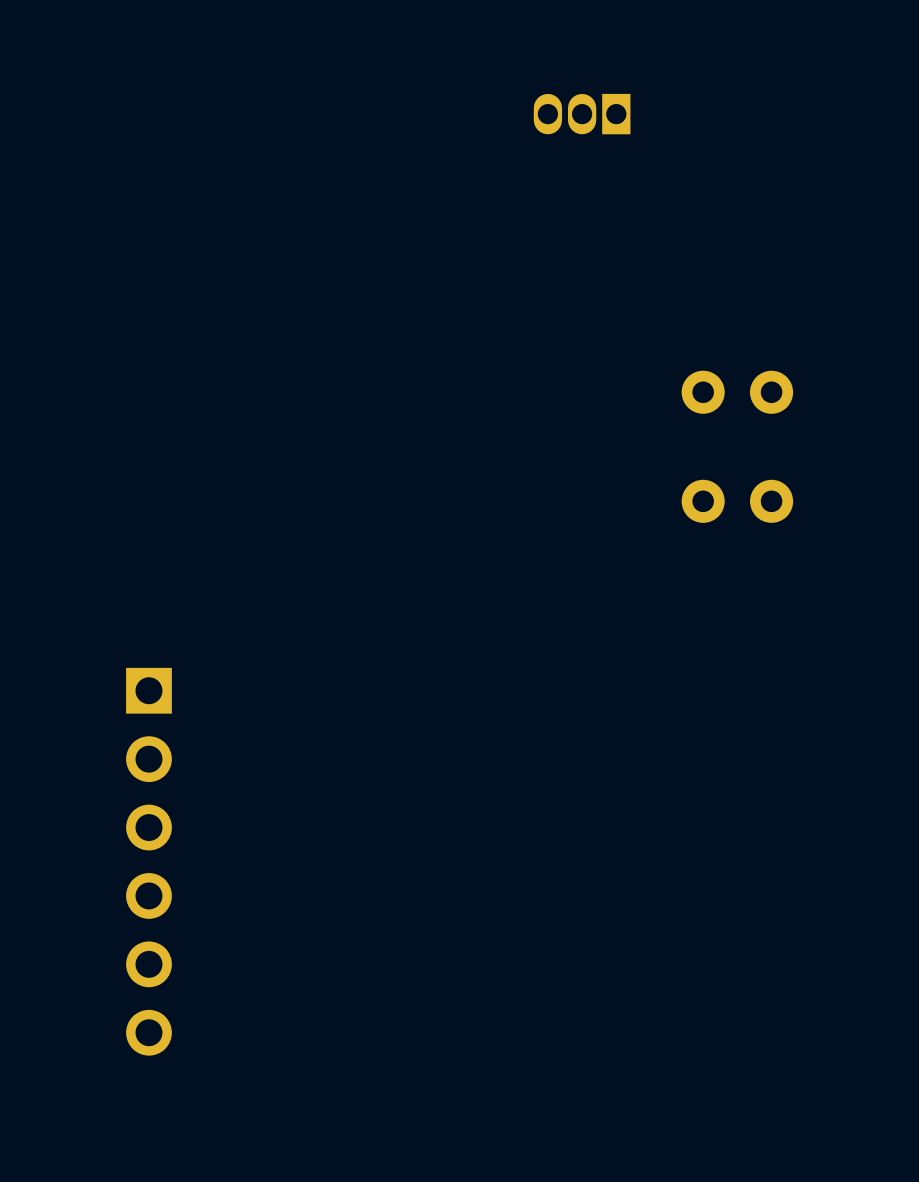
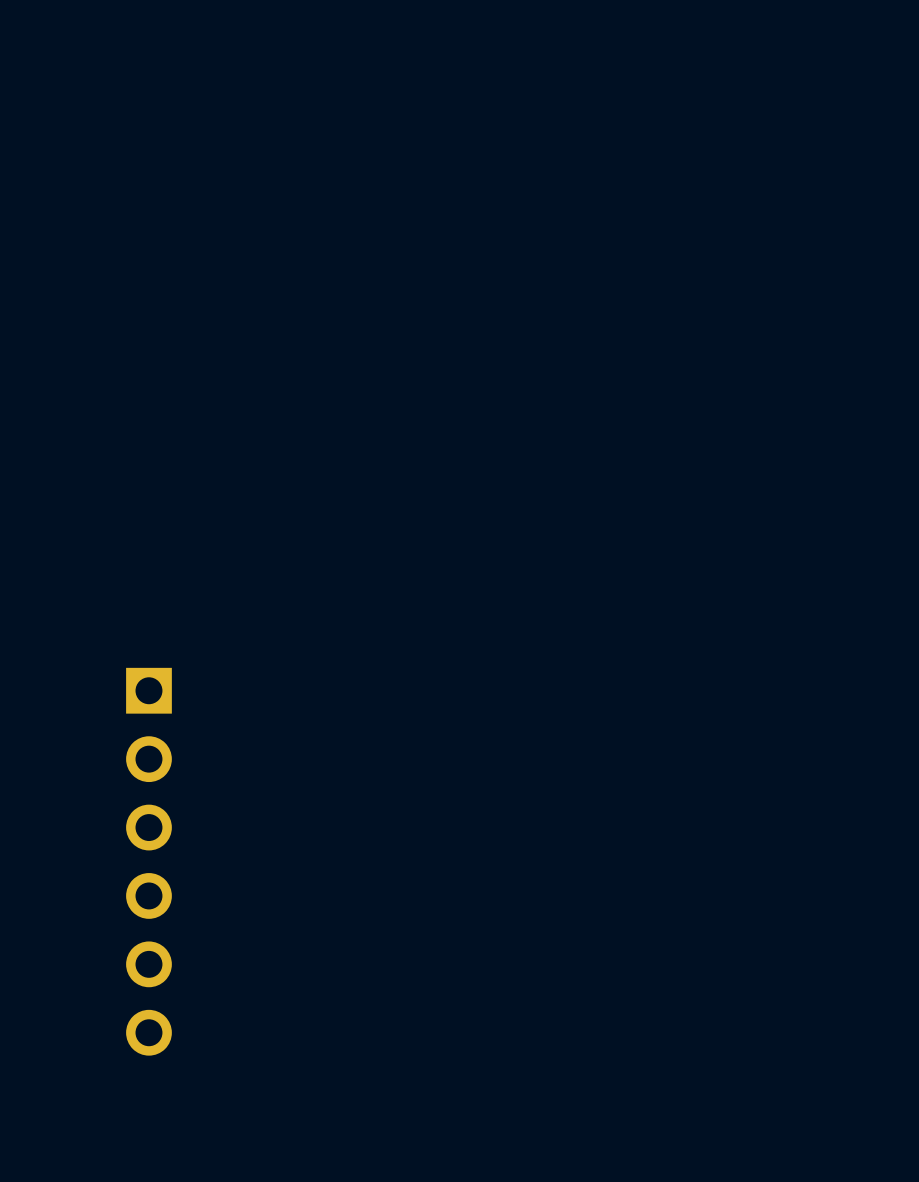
part: (582, 114) -> none
part: (737, 392) -> none
part: (737, 501) -> none

